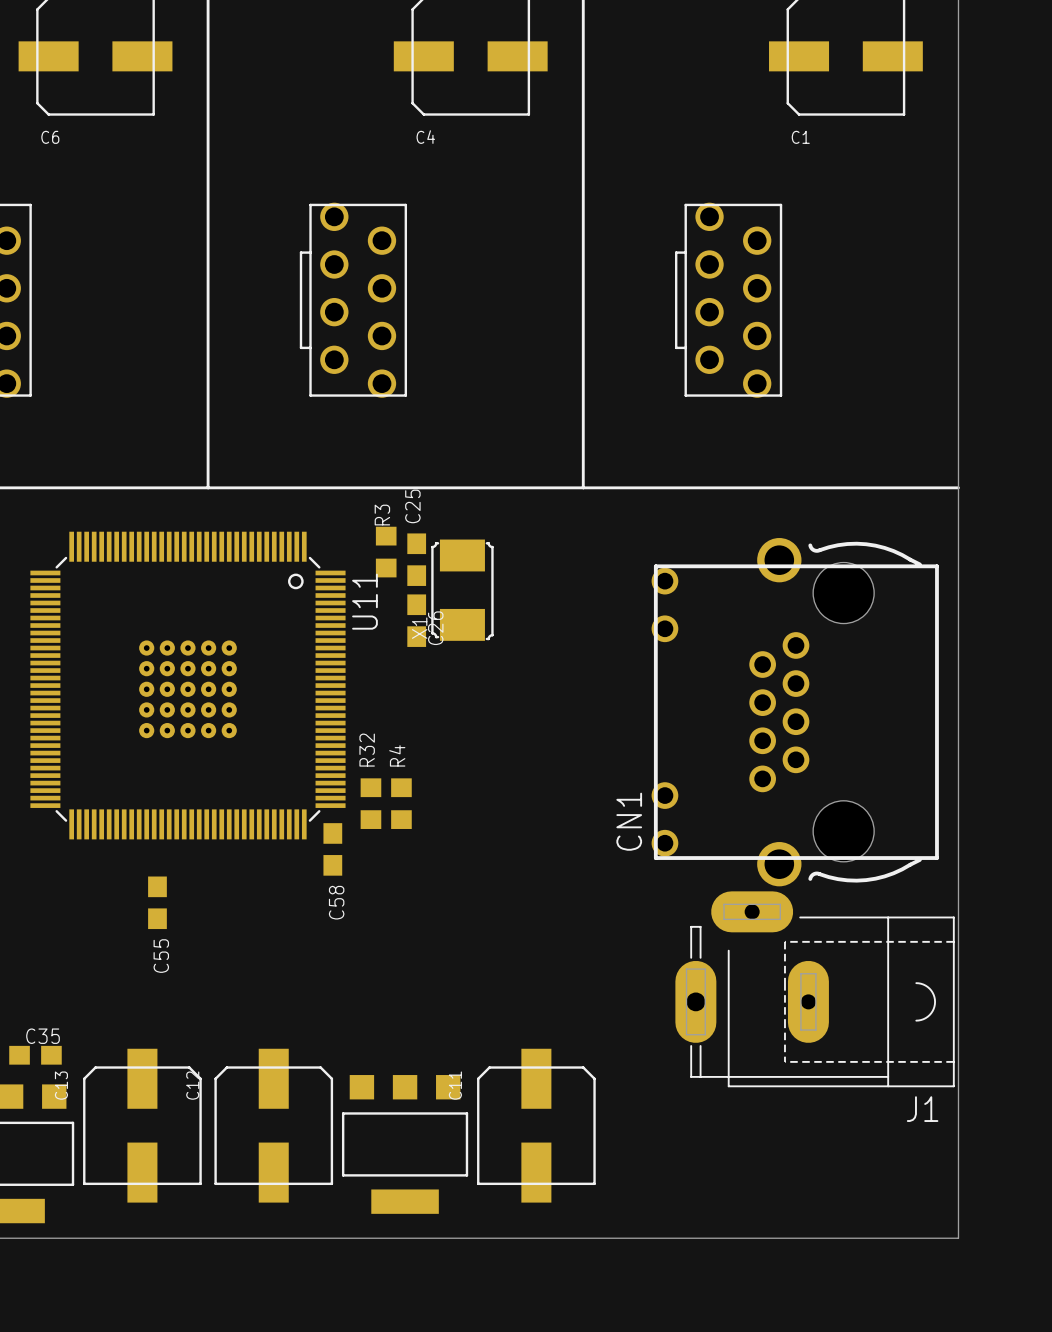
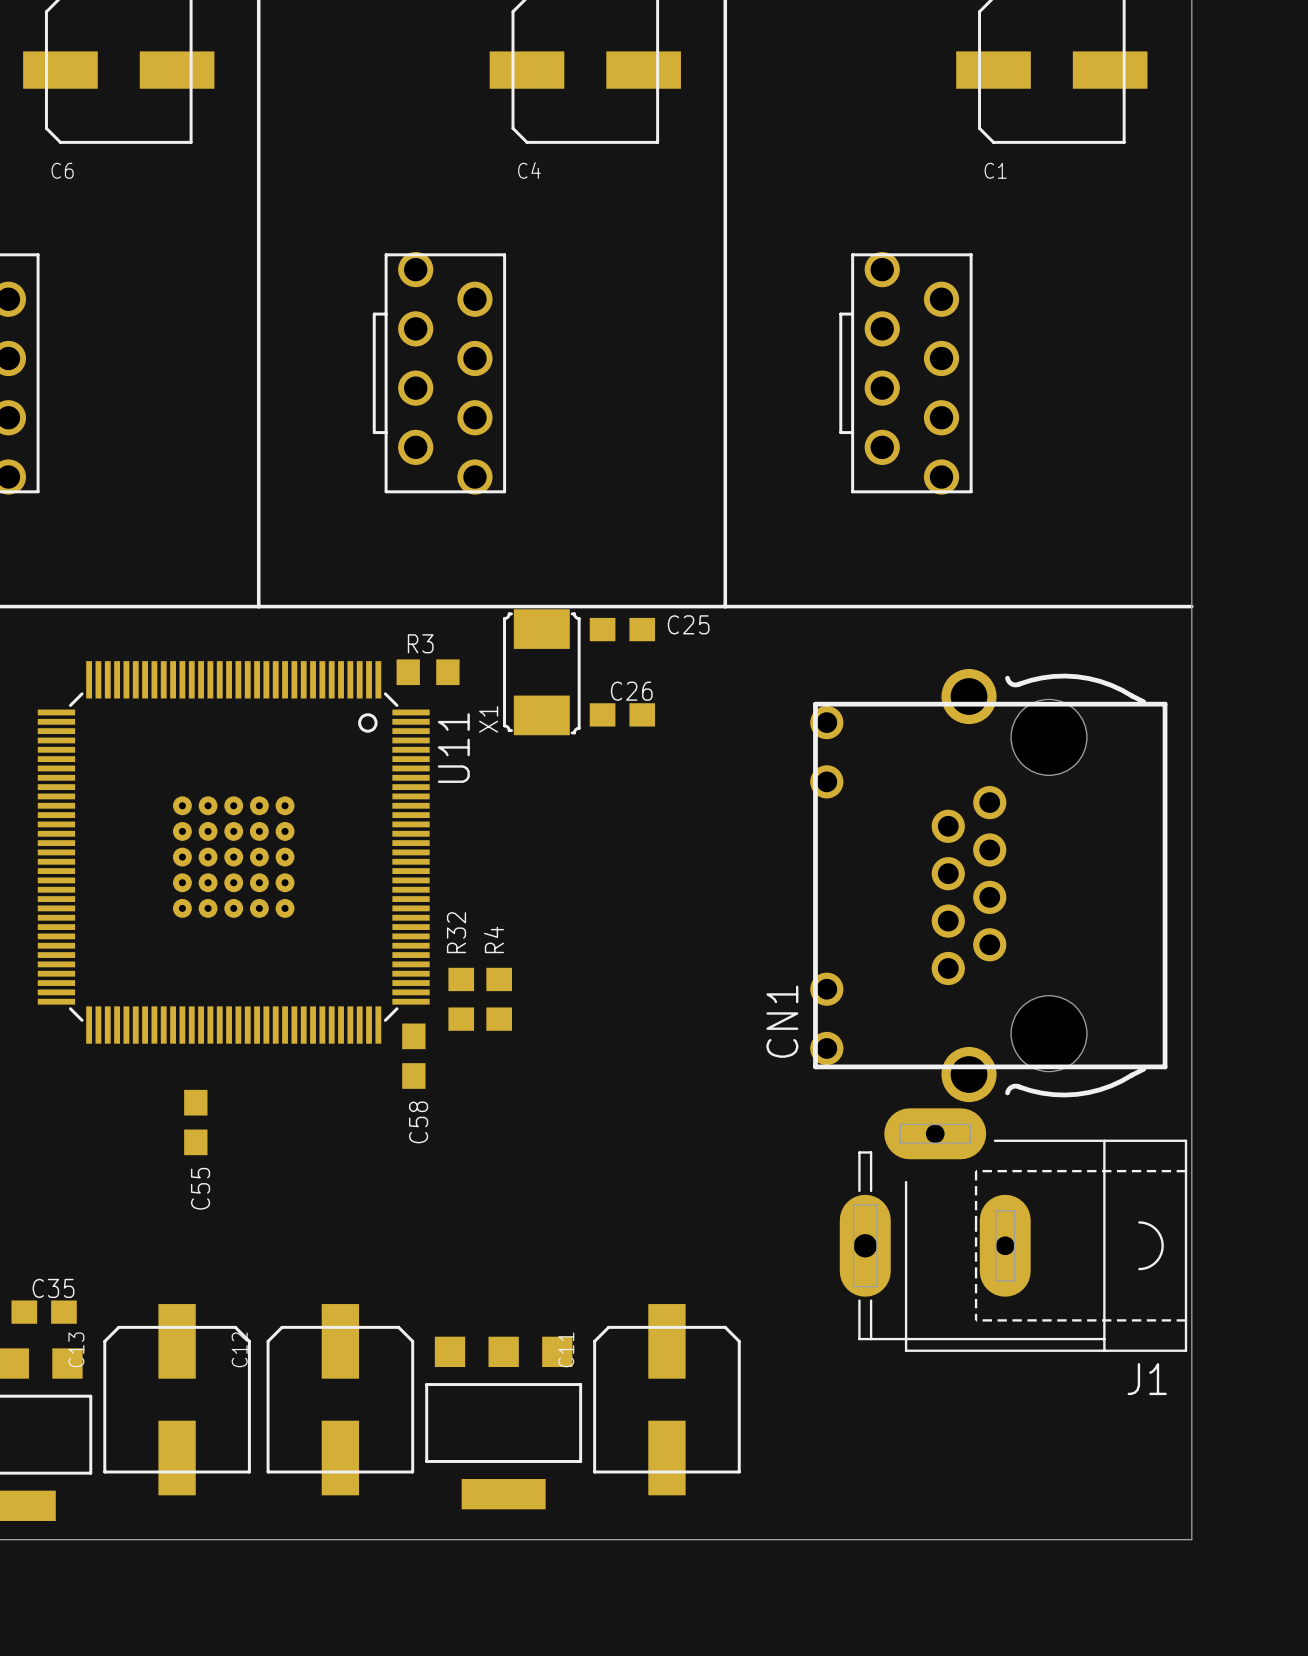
R3 rotation: 0° (386, 552) -> 90° clockwise (428, 672)
R3 position: (386, 552) -> (428, 672)
C25 rotation: 0° (416, 559) -> 90° clockwise (622, 629)
C25 position: (416, 559) -> (622, 629)
X1 position: (462, 590) -> (541, 672)
C26 rotation: 0° (416, 620) -> 90° clockwise (622, 714)
C26 position: (416, 620) -> (622, 714)

